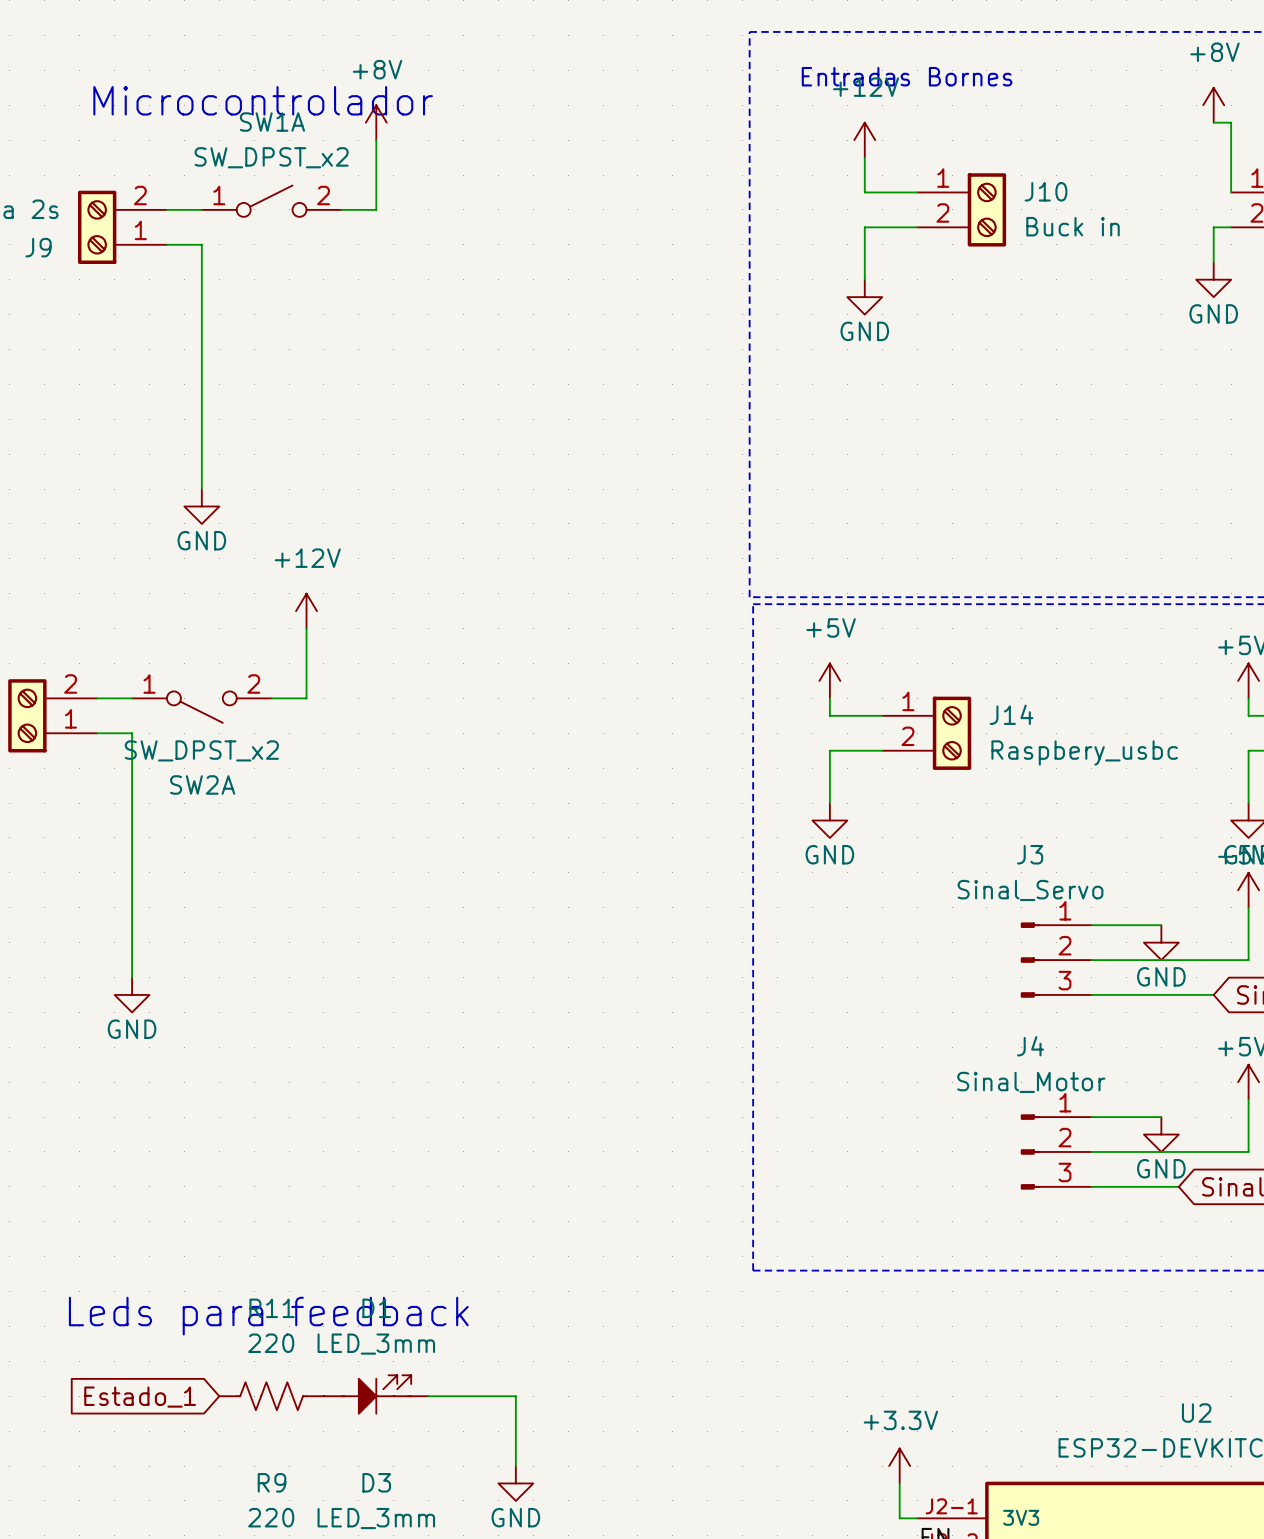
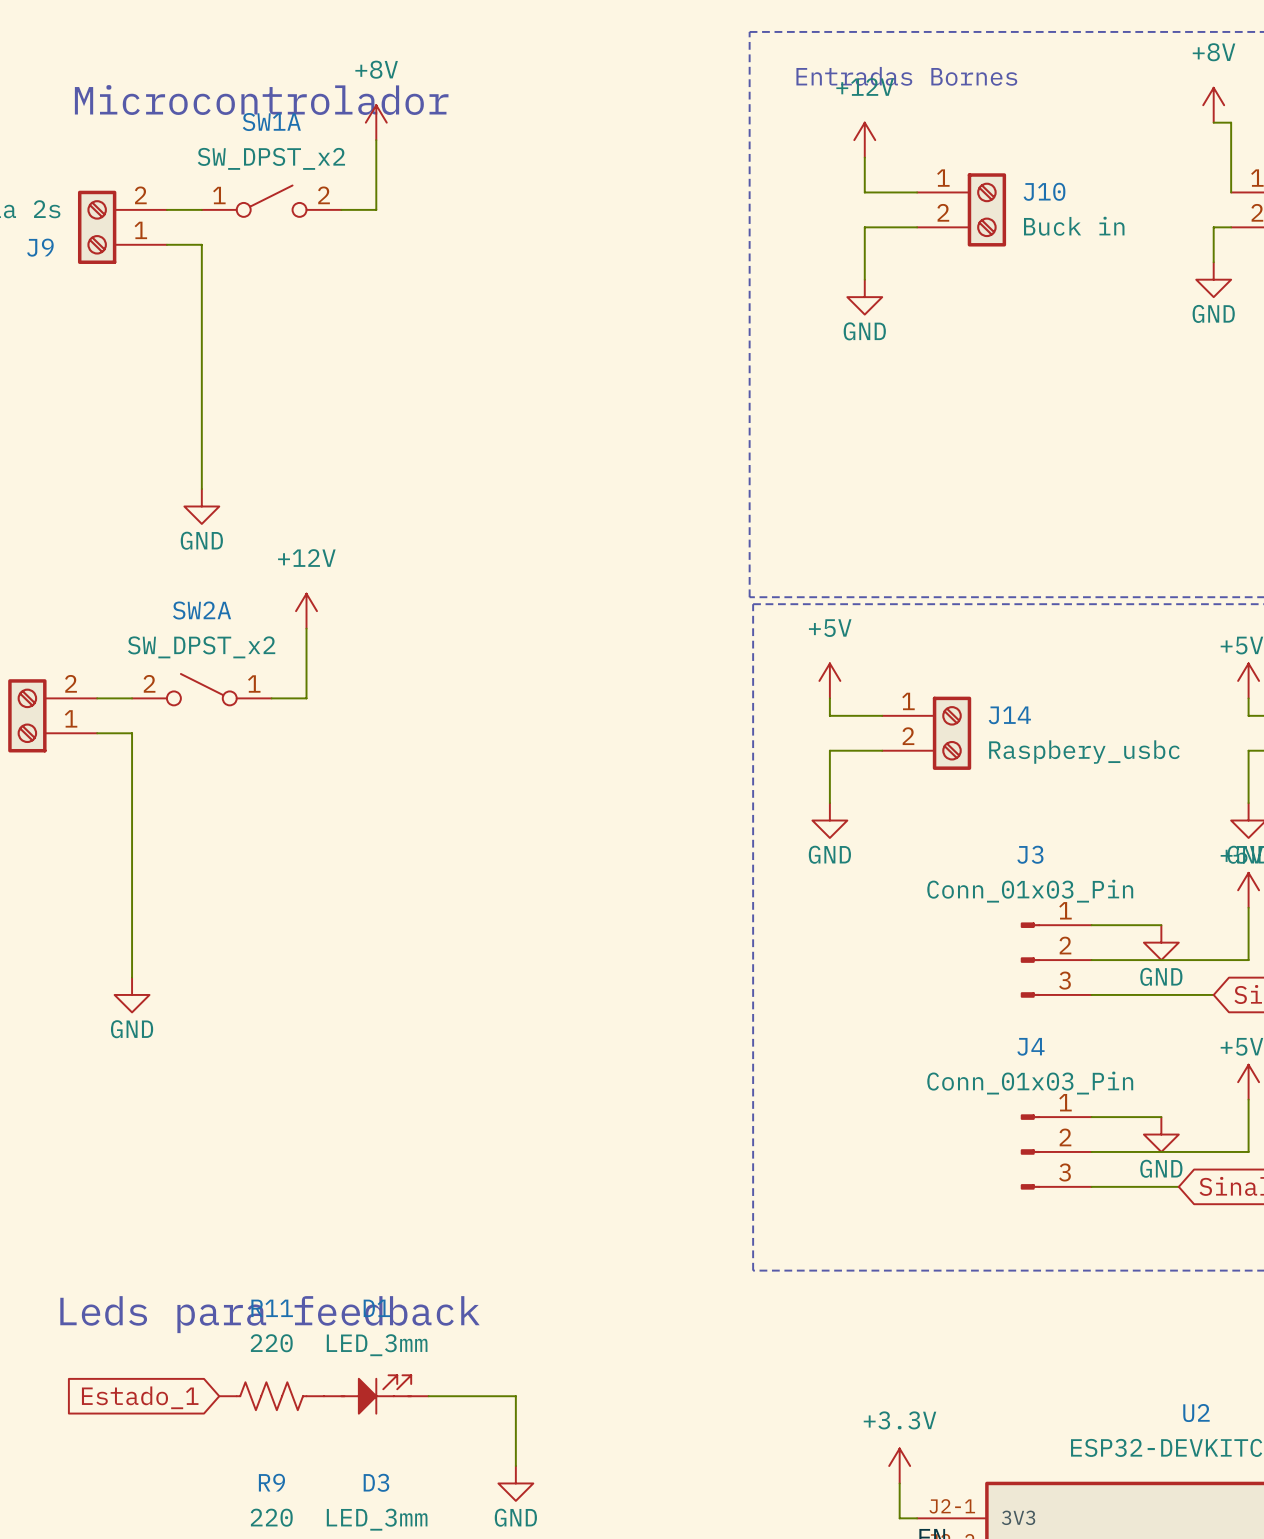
SW2A rotation: 0° (201, 707) -> 180° (201, 689)
J3 value: Sinal_Servo (1030, 890) -> Conn_01x03_Pin (1030, 891)
J4 value: Sinal_Motor (1031, 1082) -> Conn_01x03_Pin (1030, 1083)

